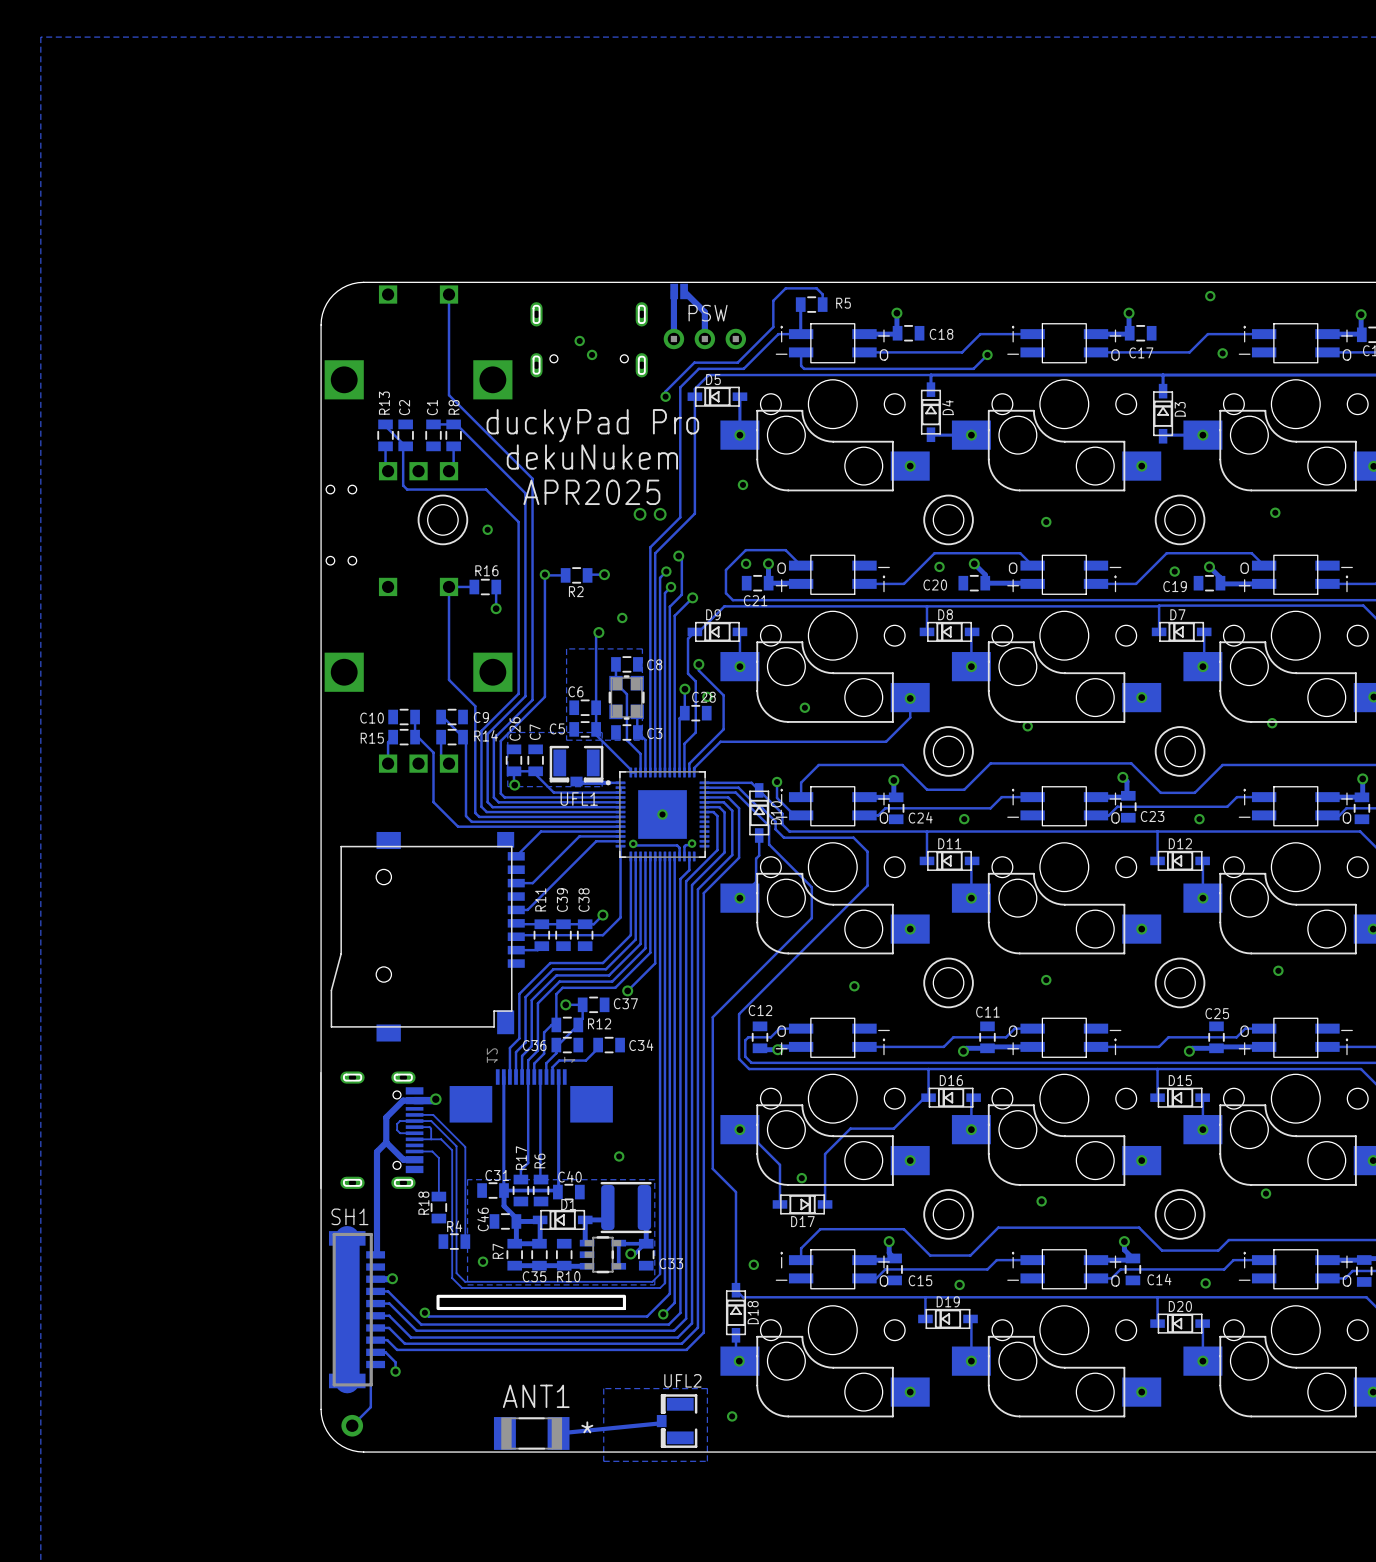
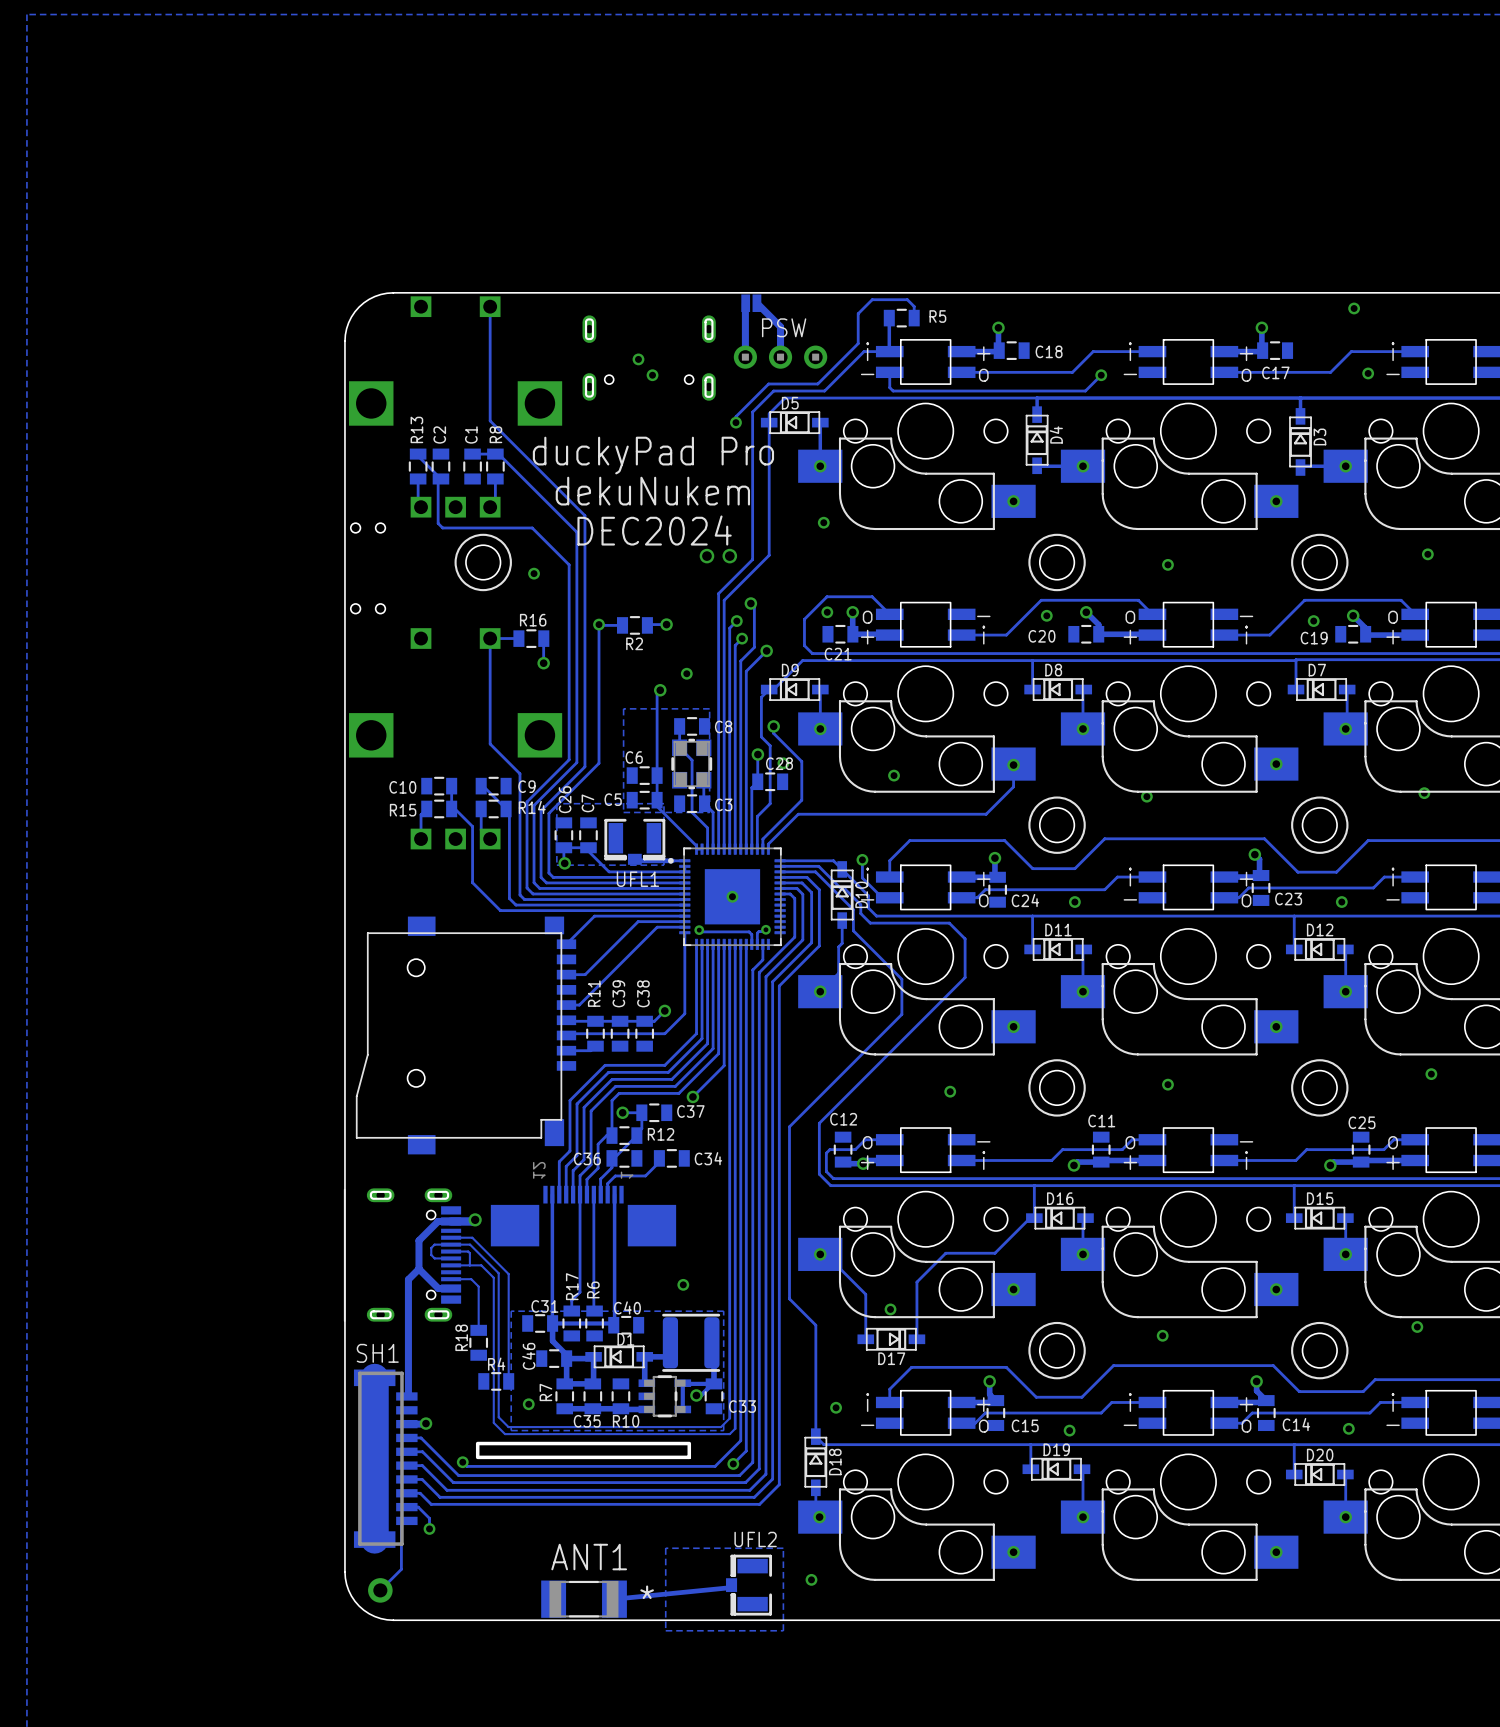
text: APR2025 (591, 492) -> DEC2024 (654, 530)

